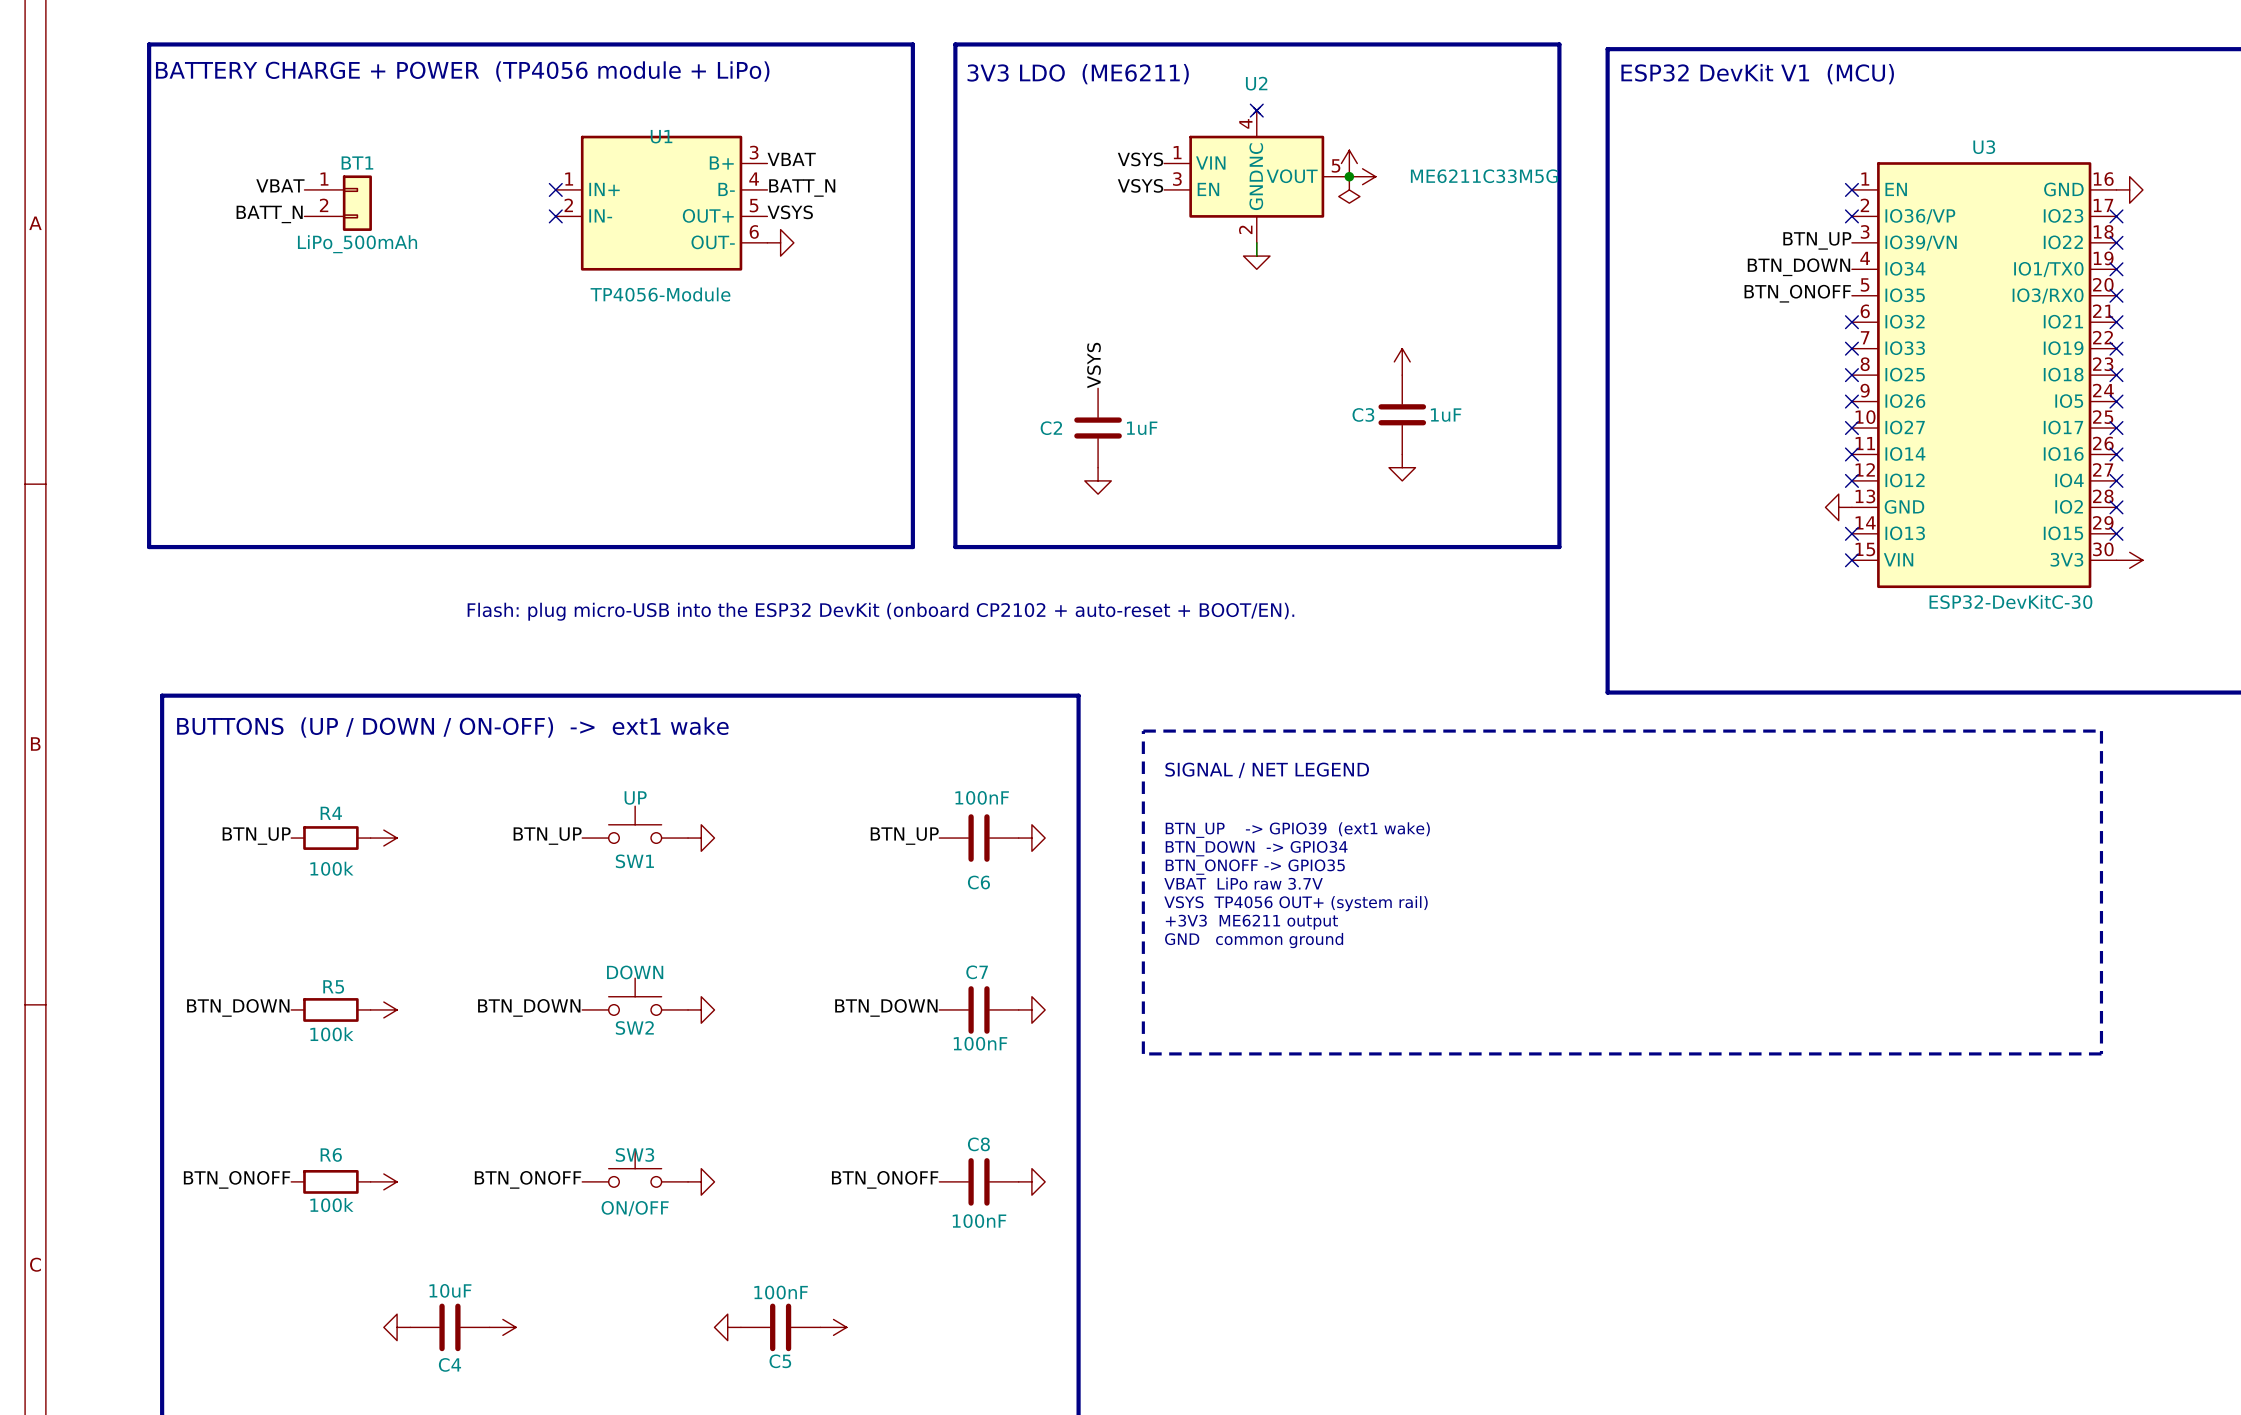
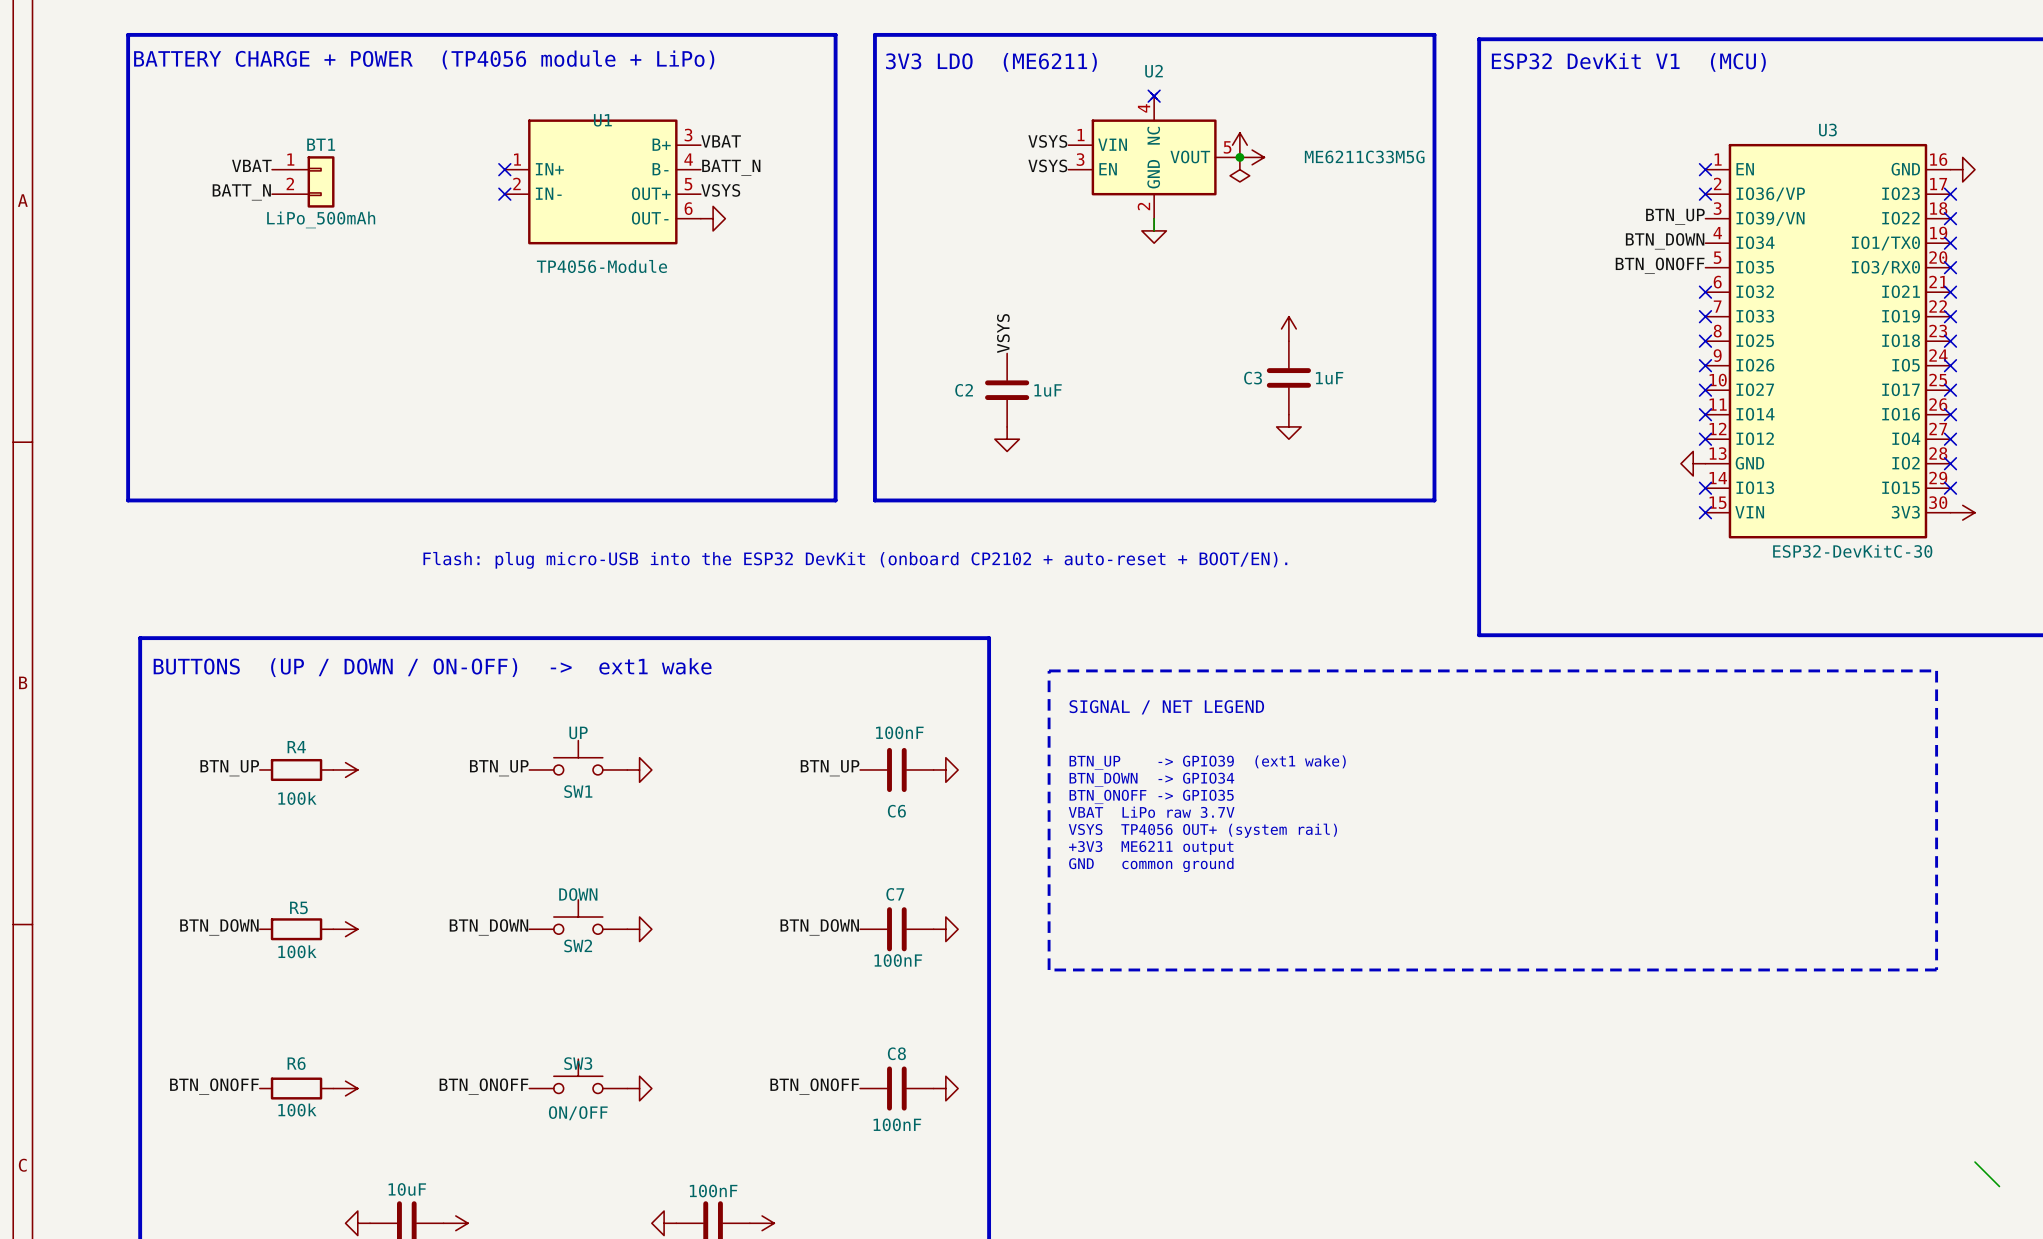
wire: none -> (1974, 1162) (1999, 1186)

